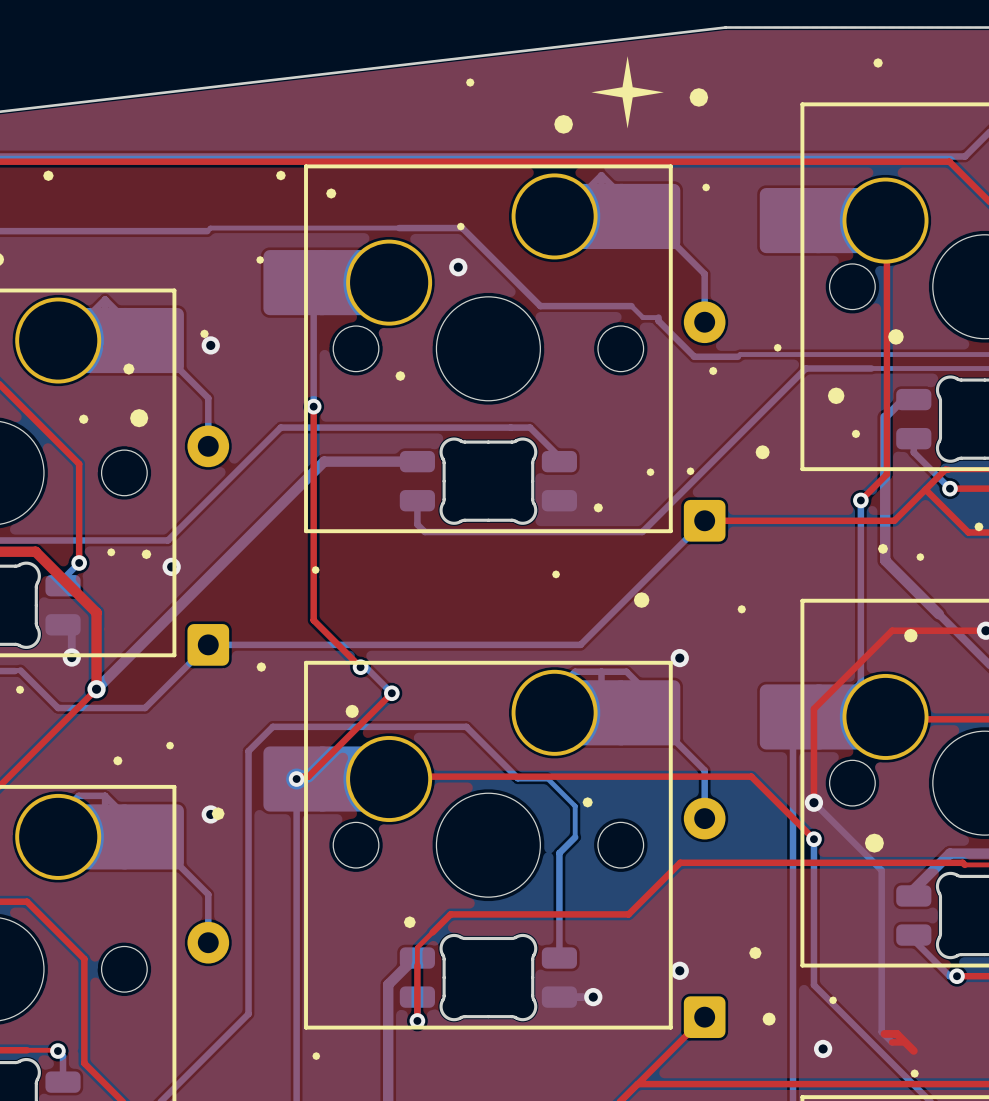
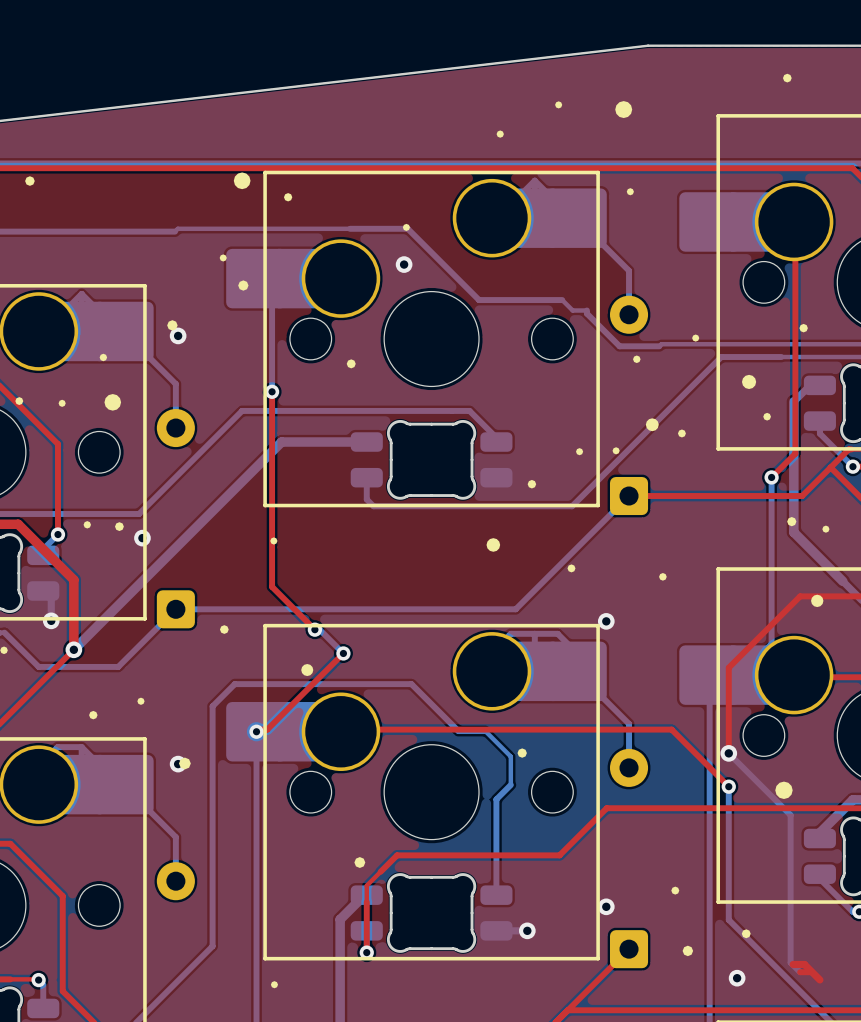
drawing shape: [591, 56, 664, 129] -> [555, 101, 563, 109]
drawing: [466, 78, 475, 87] -> none
drawing: none -> [496, 130, 504, 138]
drawing position: (563, 124) -> (242, 180)
drawing position: (280, 175) -> (288, 197)
drawing: [326, 188, 337, 199] -> none
drawing: none -> [238, 280, 249, 291]
drawing: [200, 329, 209, 339] -> none
drawing: none -> [799, 323, 808, 333]
drawing position: (895, 336) -> (749, 381)
drawing: none -> [99, 353, 108, 362]
drawing position: (128, 369) -> (172, 325)
drawing: [827, 387, 845, 405] -> none
drawing: none -> [58, 399, 66, 407]
drawing position: (83, 419) -> (19, 401)
drawing: none -> [677, 429, 686, 438]
drawing position: (762, 452) -> (652, 424)
drawing position: (556, 574) -> (571, 568)
drawing position: (641, 600) -> (493, 544)
drawing position: (755, 953) -> (687, 950)
drawing: none -> [741, 929, 751, 939]
drawing position: (833, 1000) -> (675, 890)
drawing: [762, 1012, 776, 1026] -> none
drawing: [910, 1069, 919, 1078] -> none

